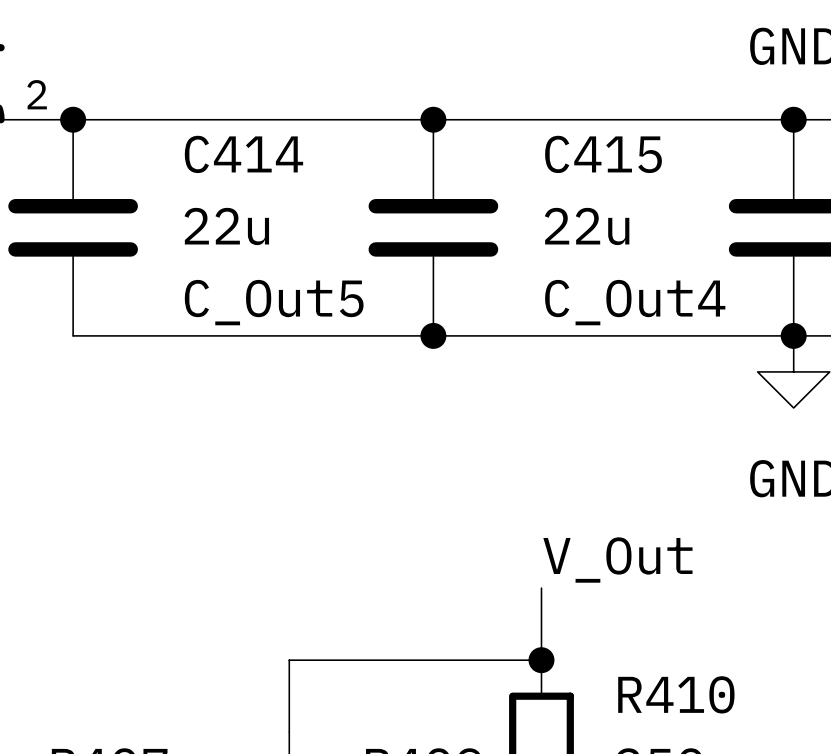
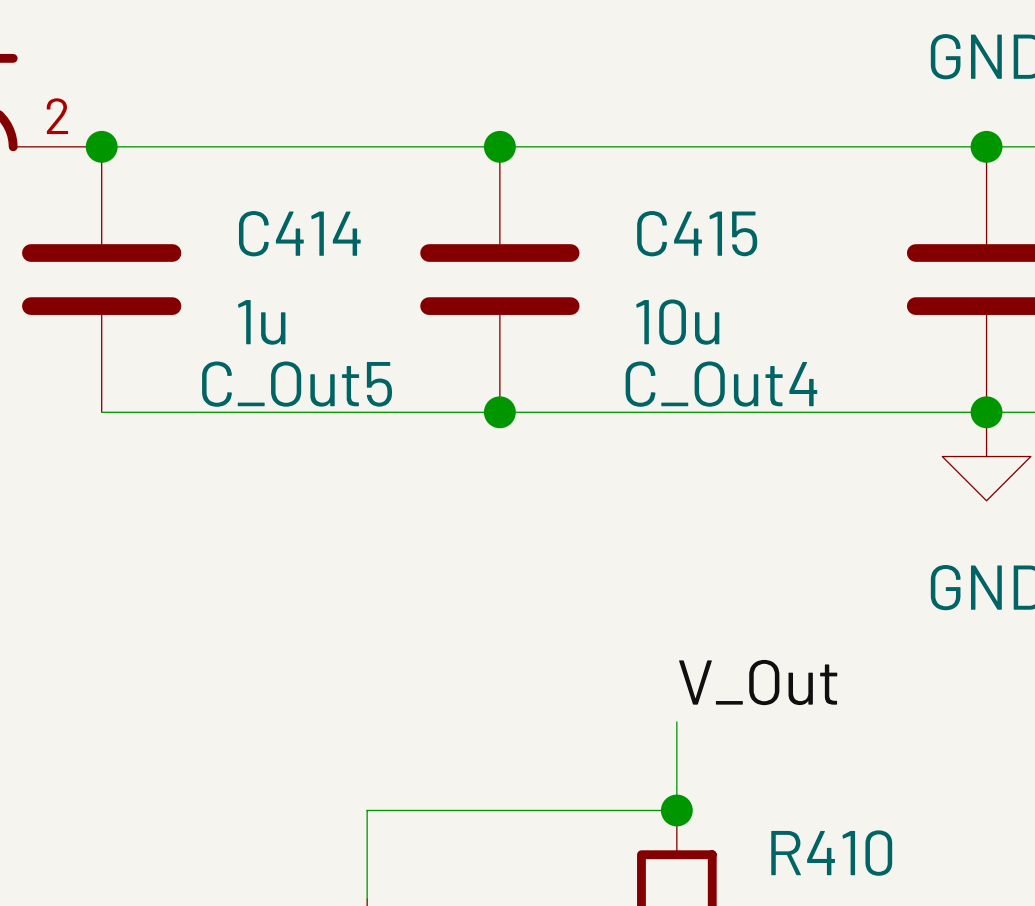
junction position: (433, 119) -> (499, 146)
C414 name position: C414 (243, 154) -> C414 (299, 233)
C415 name position: C415 (603, 154) -> C415 (697, 233)
C414 value: 22u (226, 226) -> 1u (261, 322)
C415 value: 22u (587, 226) -> 10u (677, 322)
C415 position: (433, 227) -> (499, 279)
C414 text position: C_Out5 (274, 302) -> C_Out5 (297, 384)
C415 text position: C_Out4 (635, 302) -> C_Out4 (721, 384)
junction position: (433, 335) -> (499, 412)

